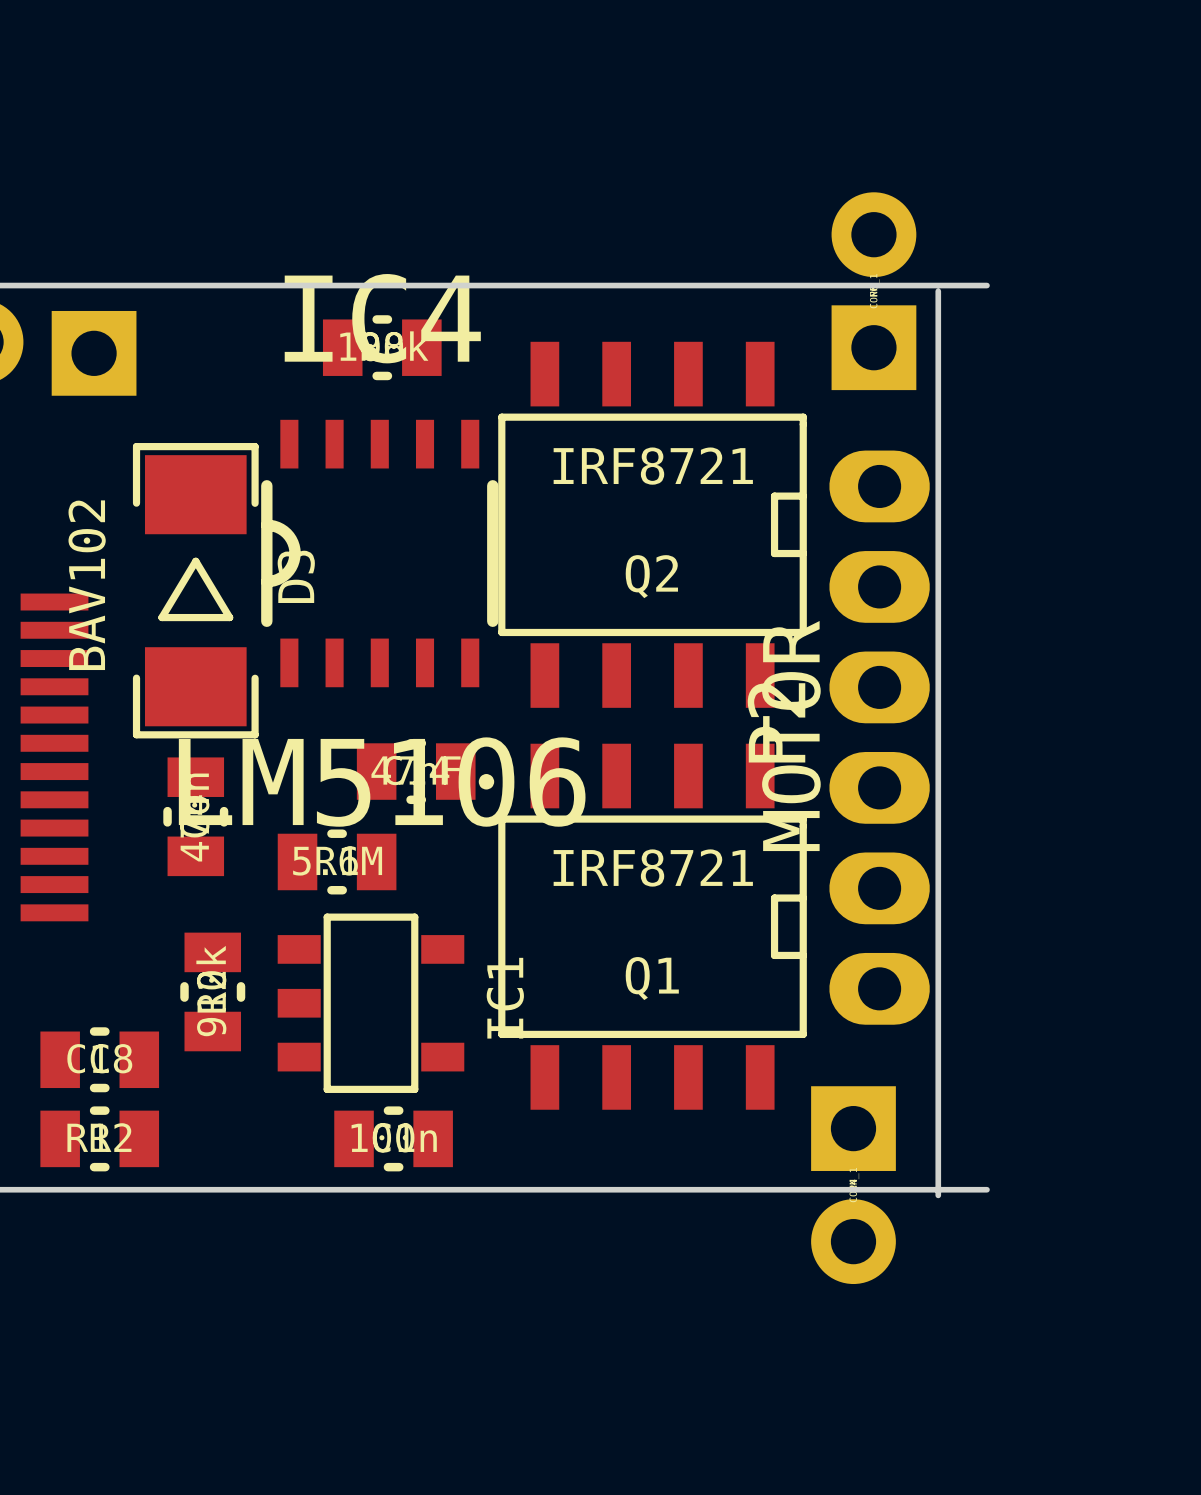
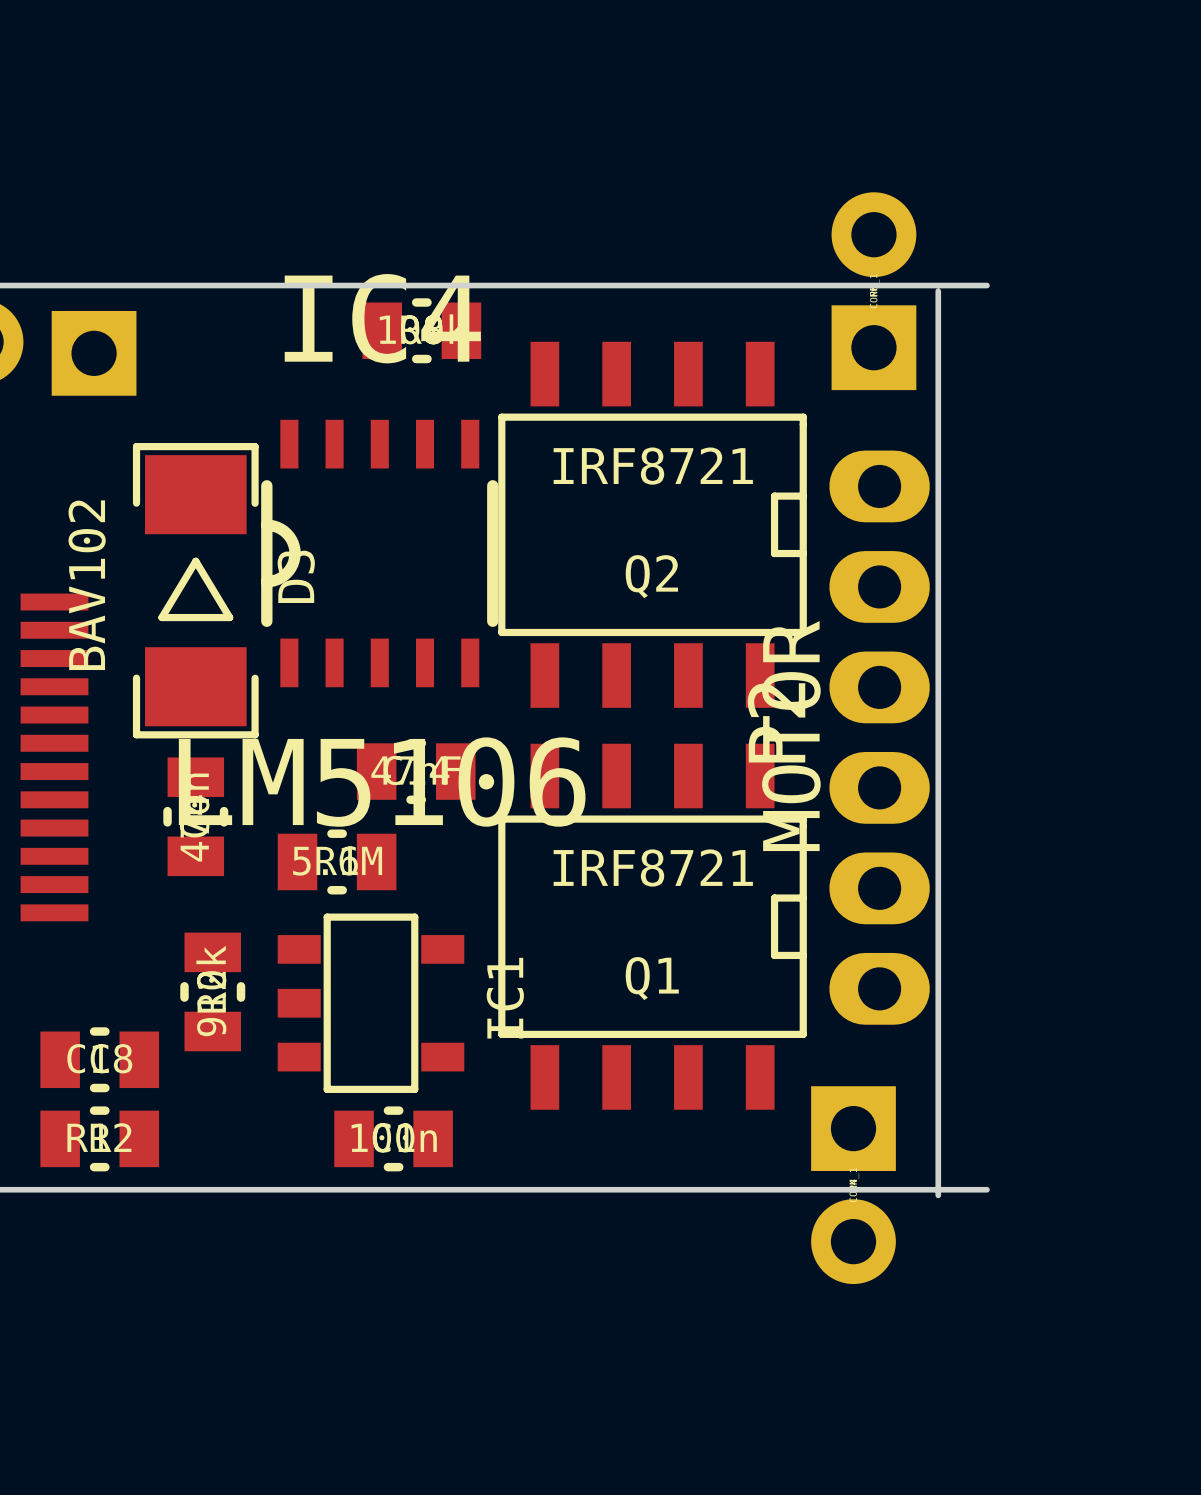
part position: (382, 347) -> (421, 330)

